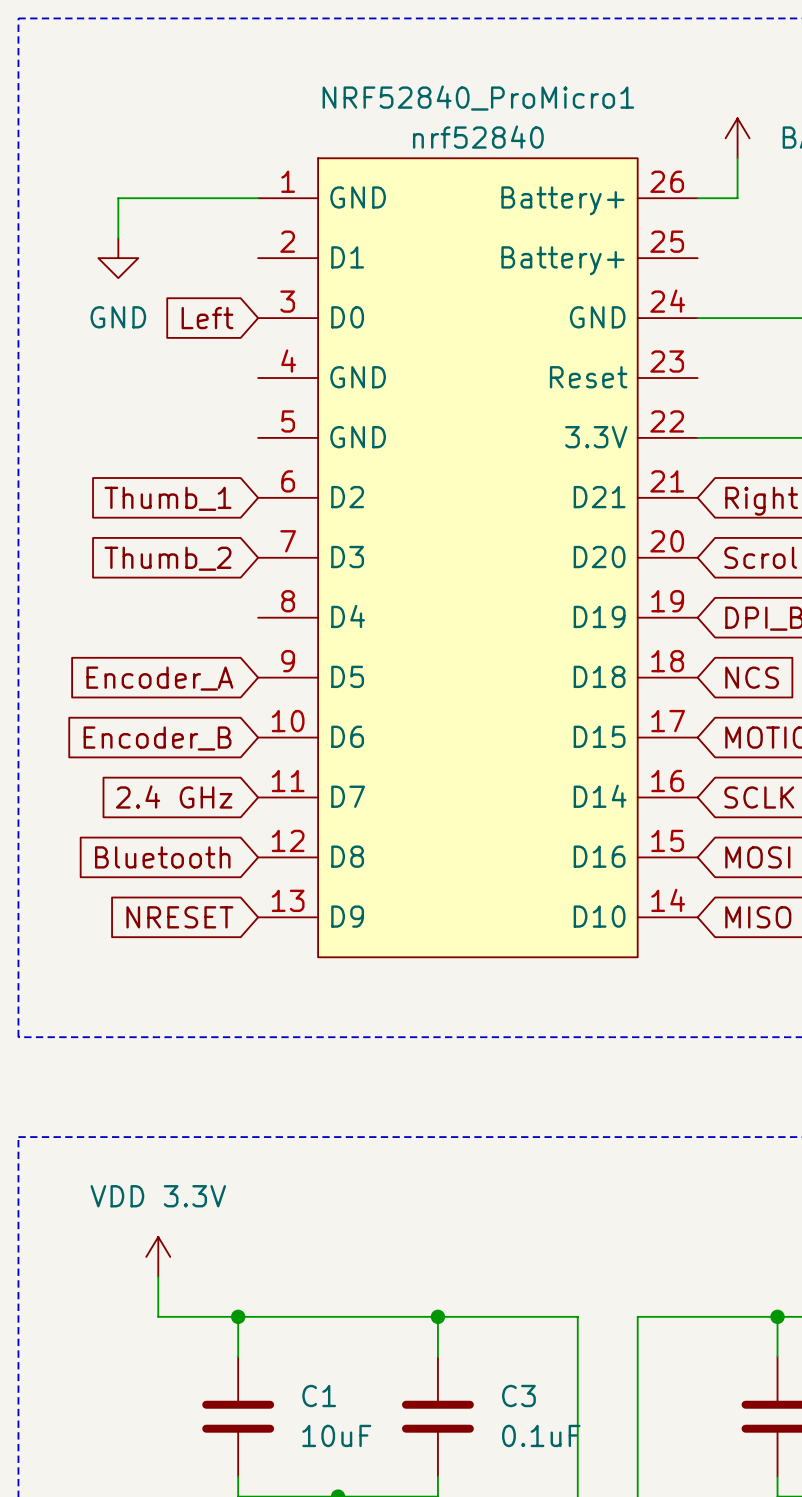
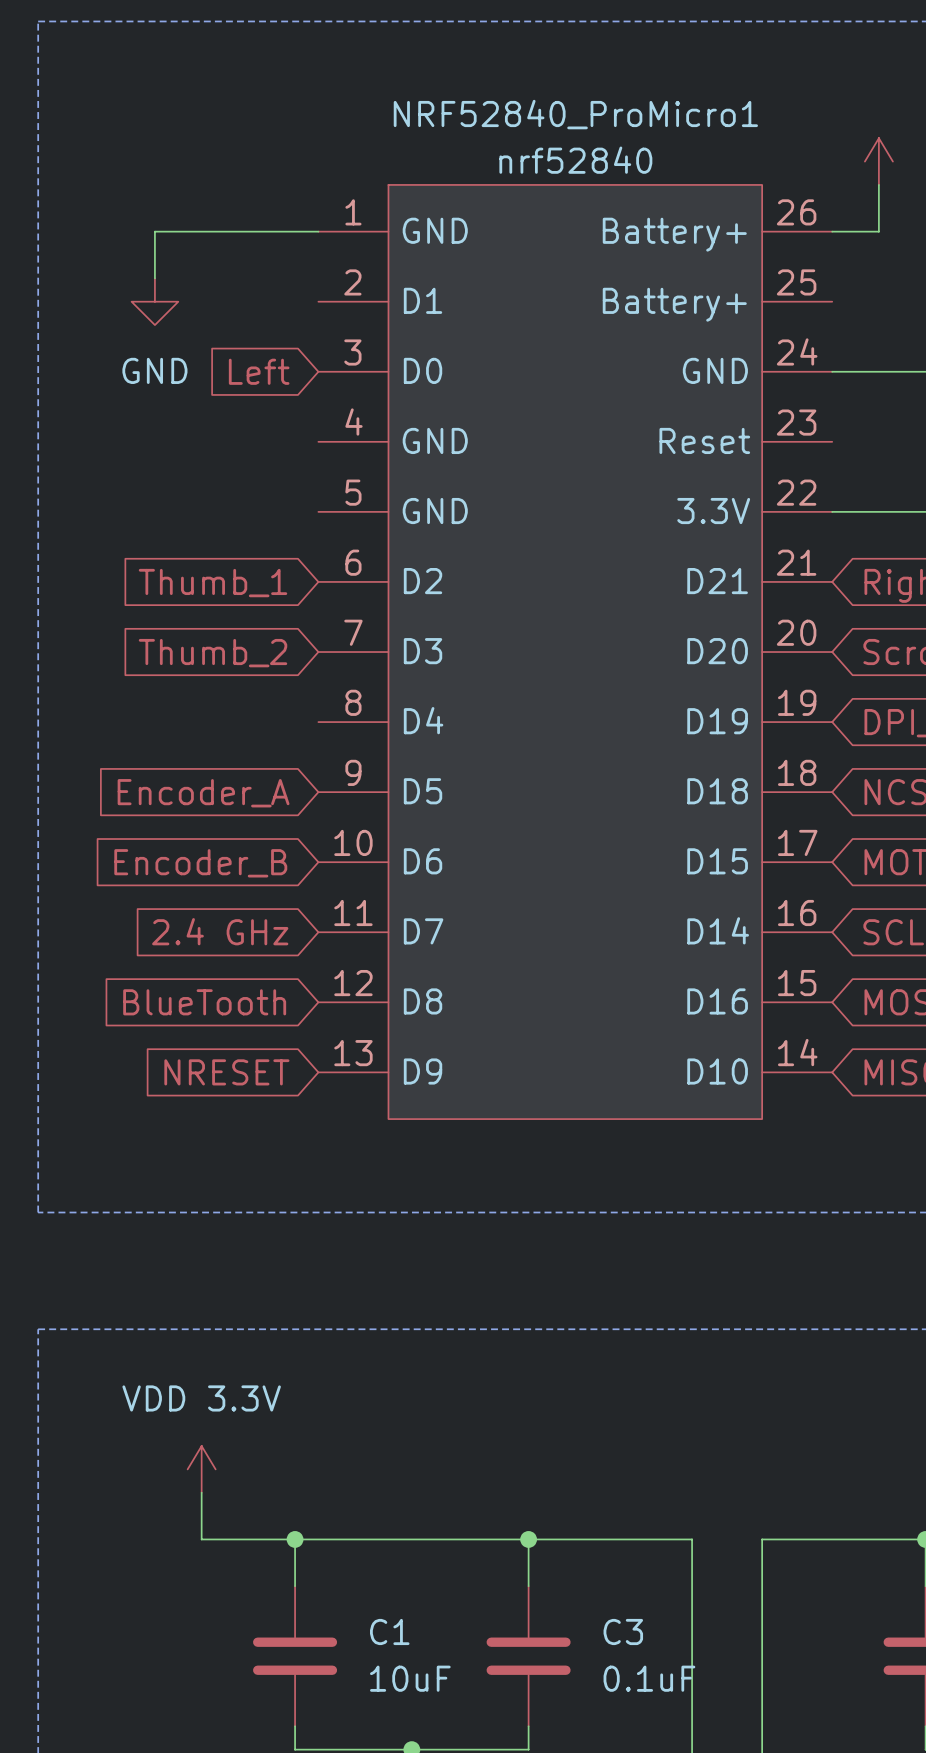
global label: Bluetooth (162, 857) -> BlueTooth (204, 1002)

